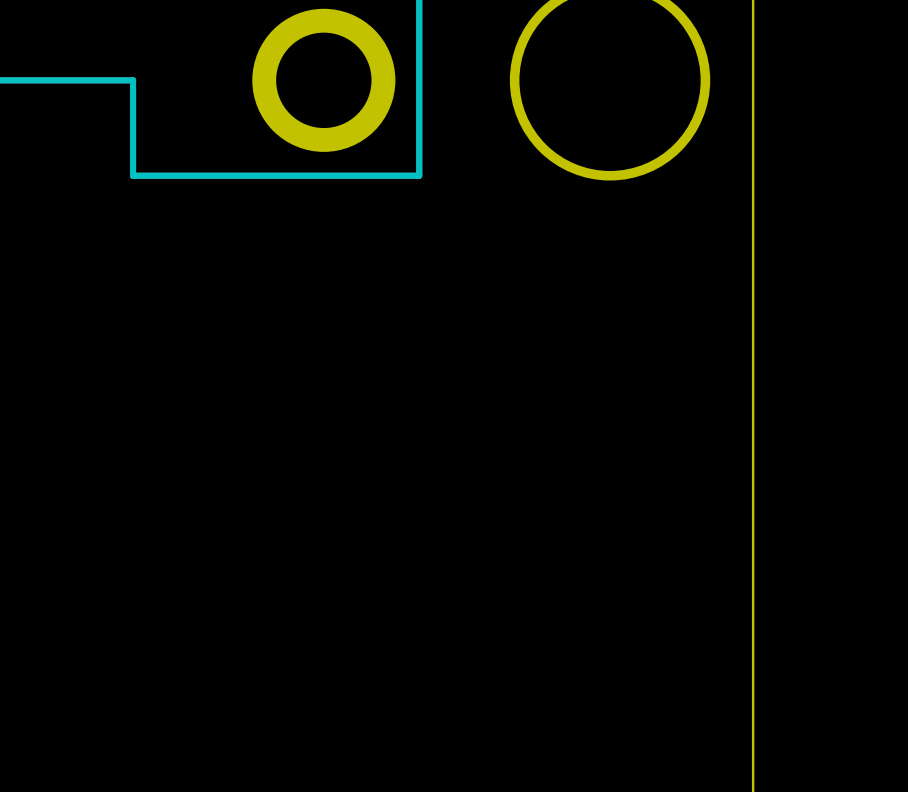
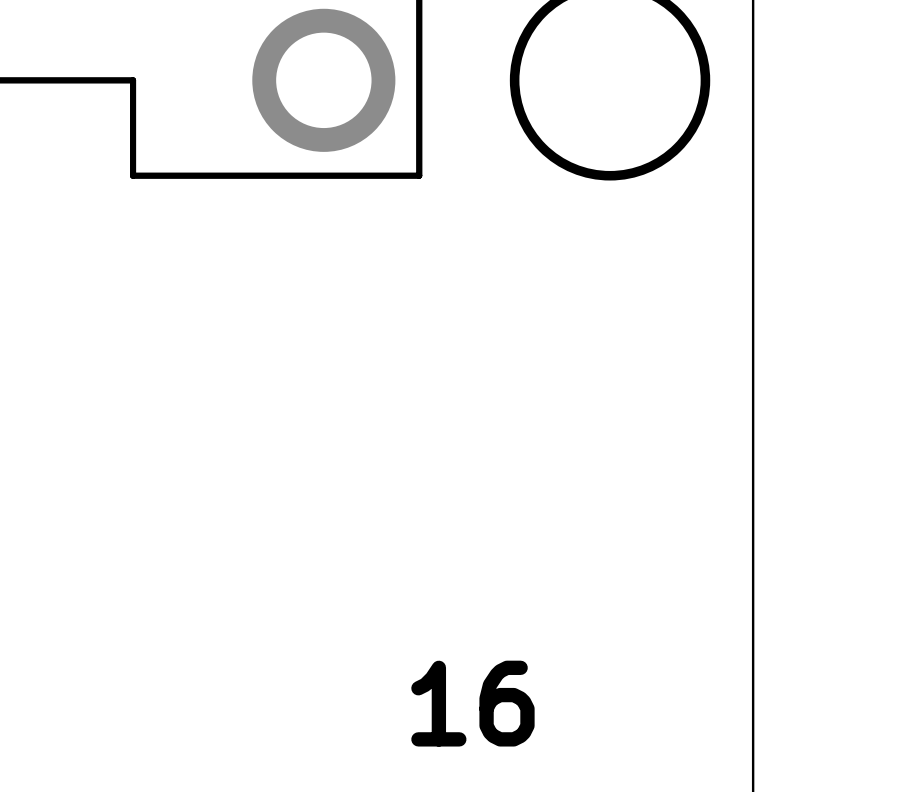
text: none -> 16 (472, 703)

